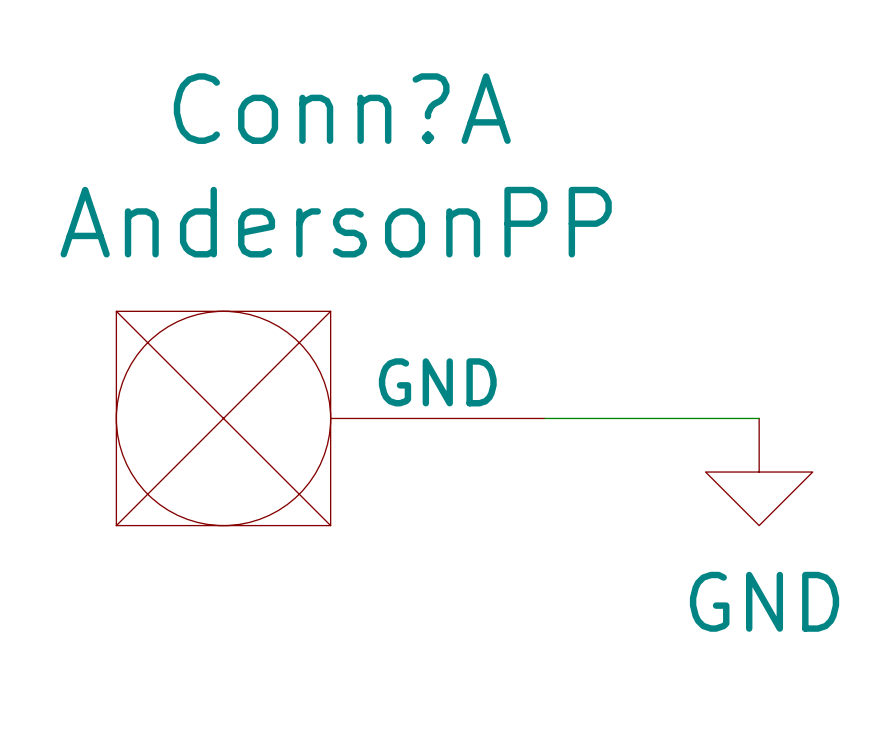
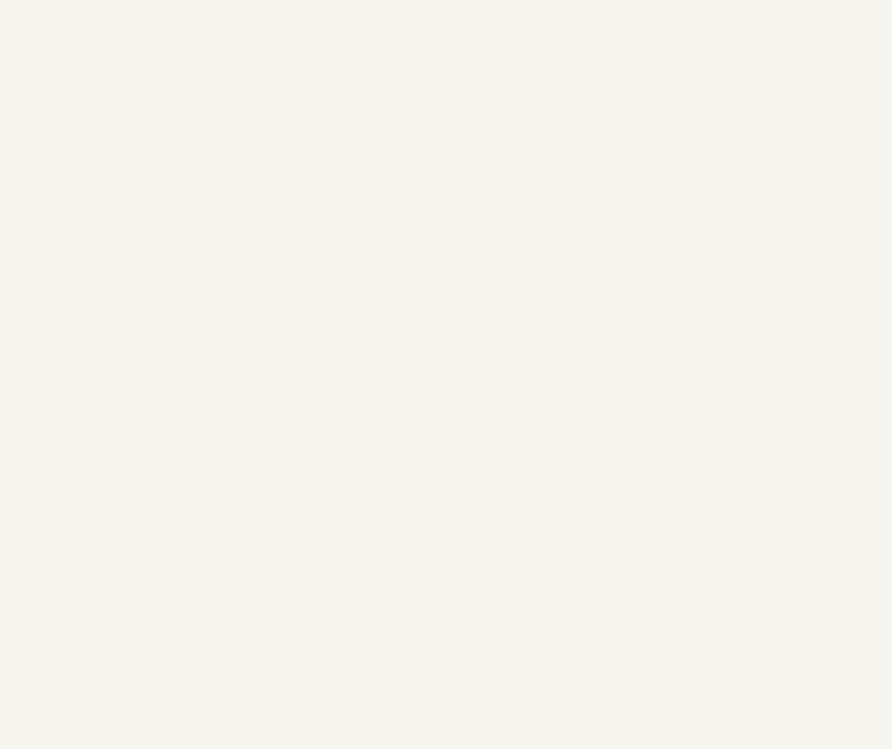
Conn?A: AndersonPP (330, 418) -> none
wire: (544, 418) (759, 418) -> none
power symbol: GND (759, 472) -> none

